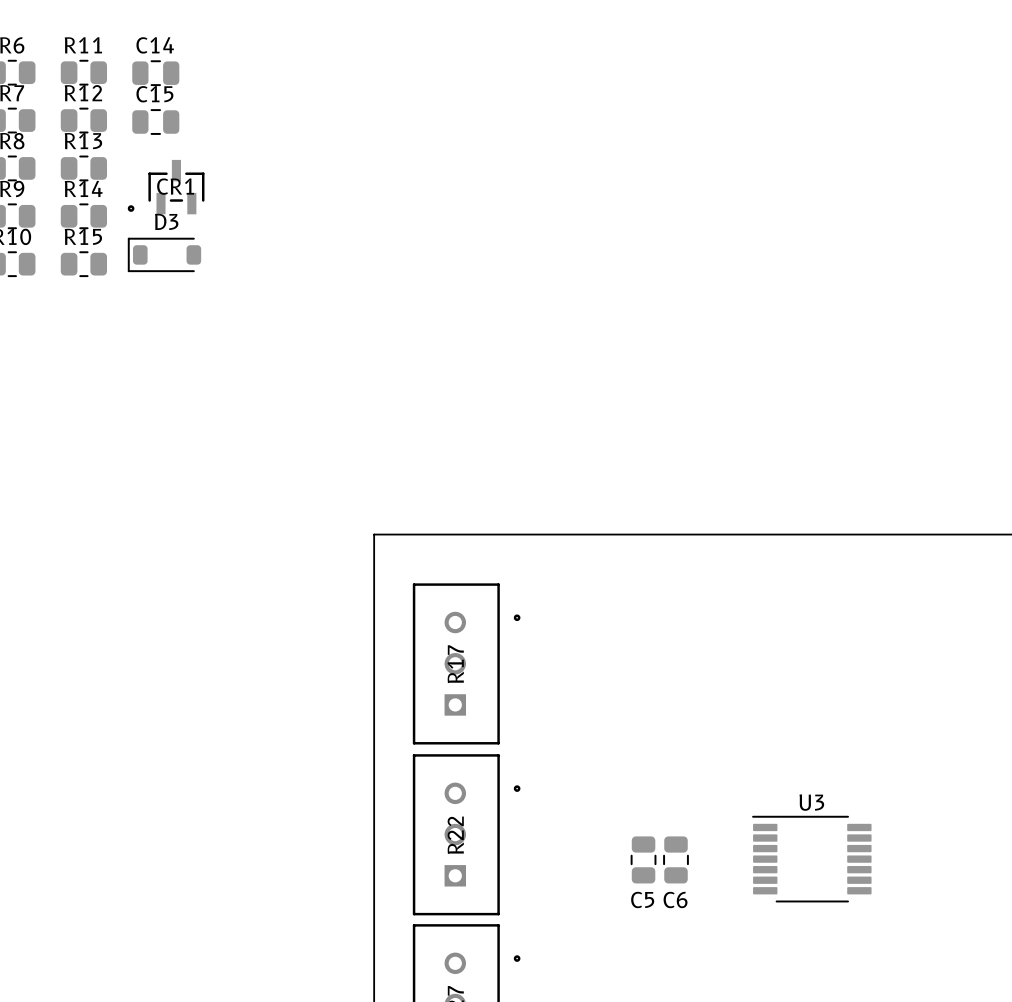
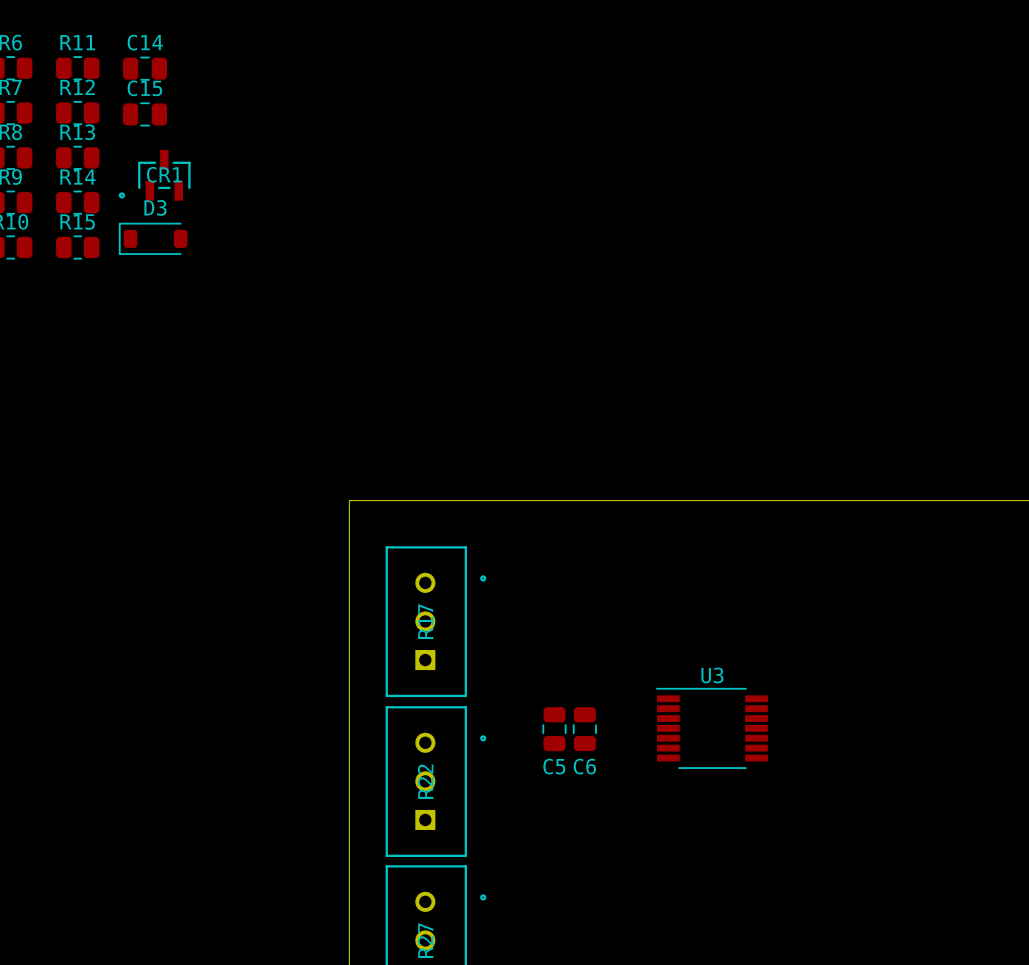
C5 position: (643, 859) -> (554, 729)
C6 position: (675, 859) -> (584, 729)
U3 position: (811, 859) -> (711, 728)

